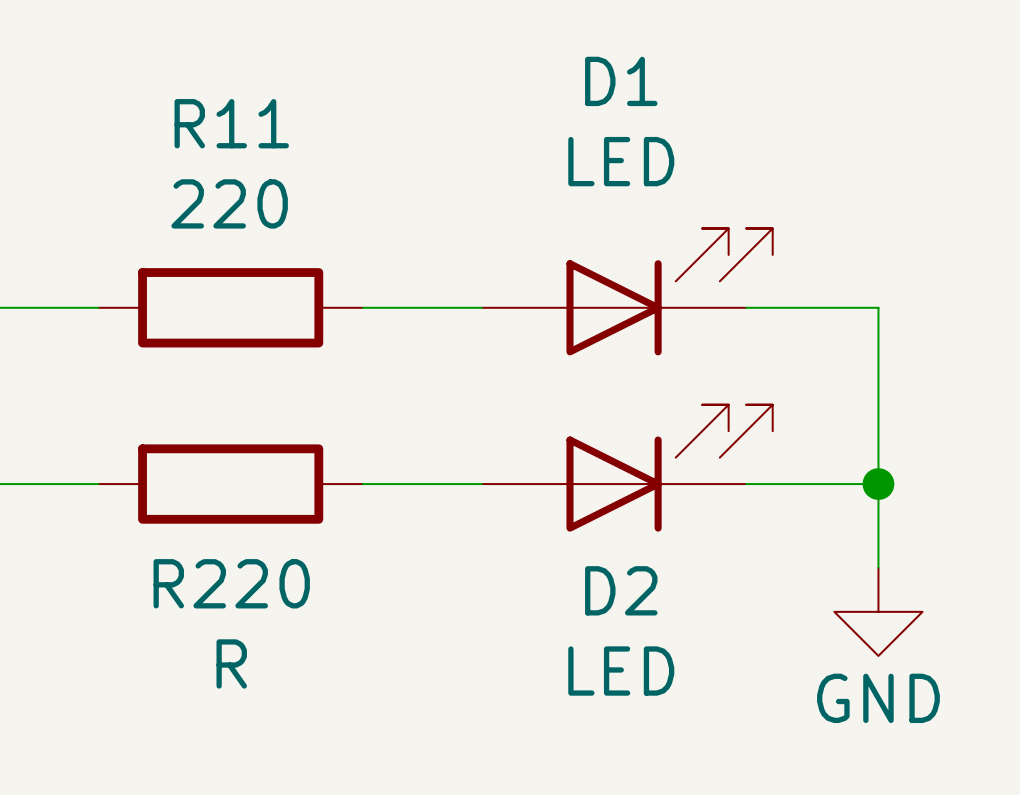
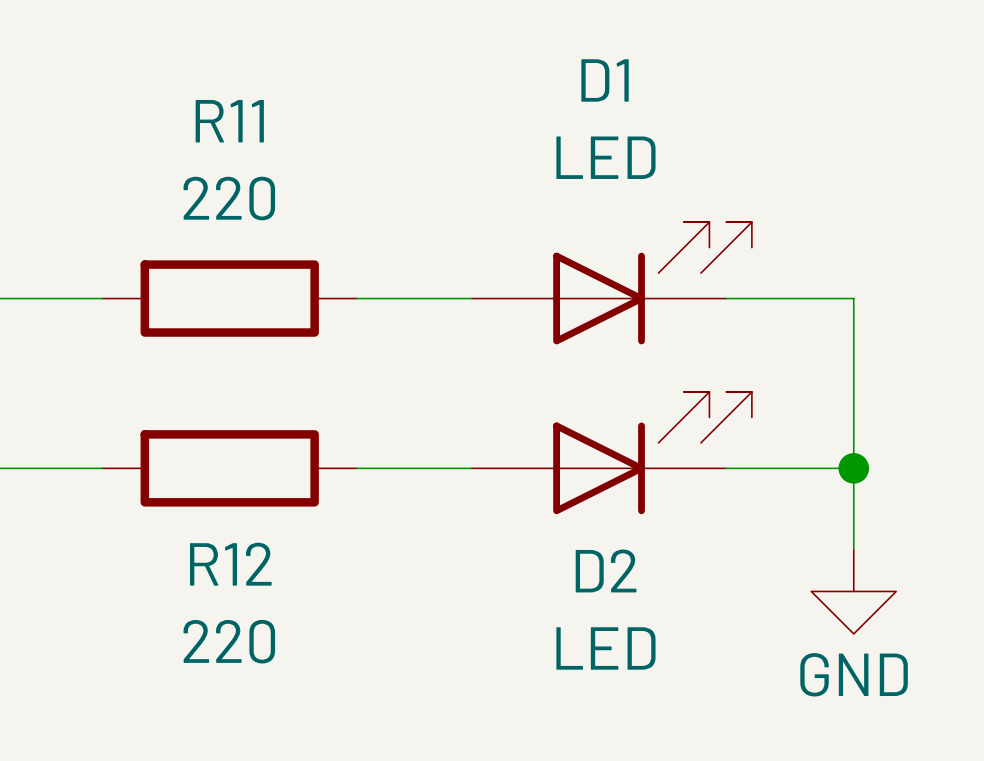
R220 name: R220 (231, 583) -> R12 (230, 564)
R220 value: R (231, 663) -> 220 (229, 641)

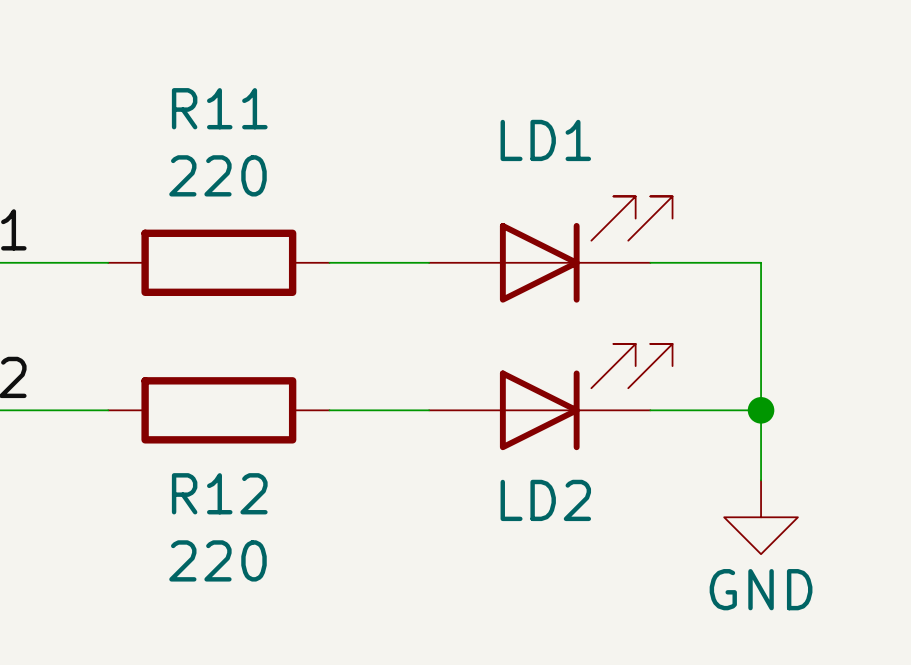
D1 name: D1 (605, 80) -> LD1 (545, 140)
D1 value: LED (605, 157) -> none
D2 name: D2 (606, 570) -> LD2 (545, 500)
D2 value: LED (605, 648) -> none

